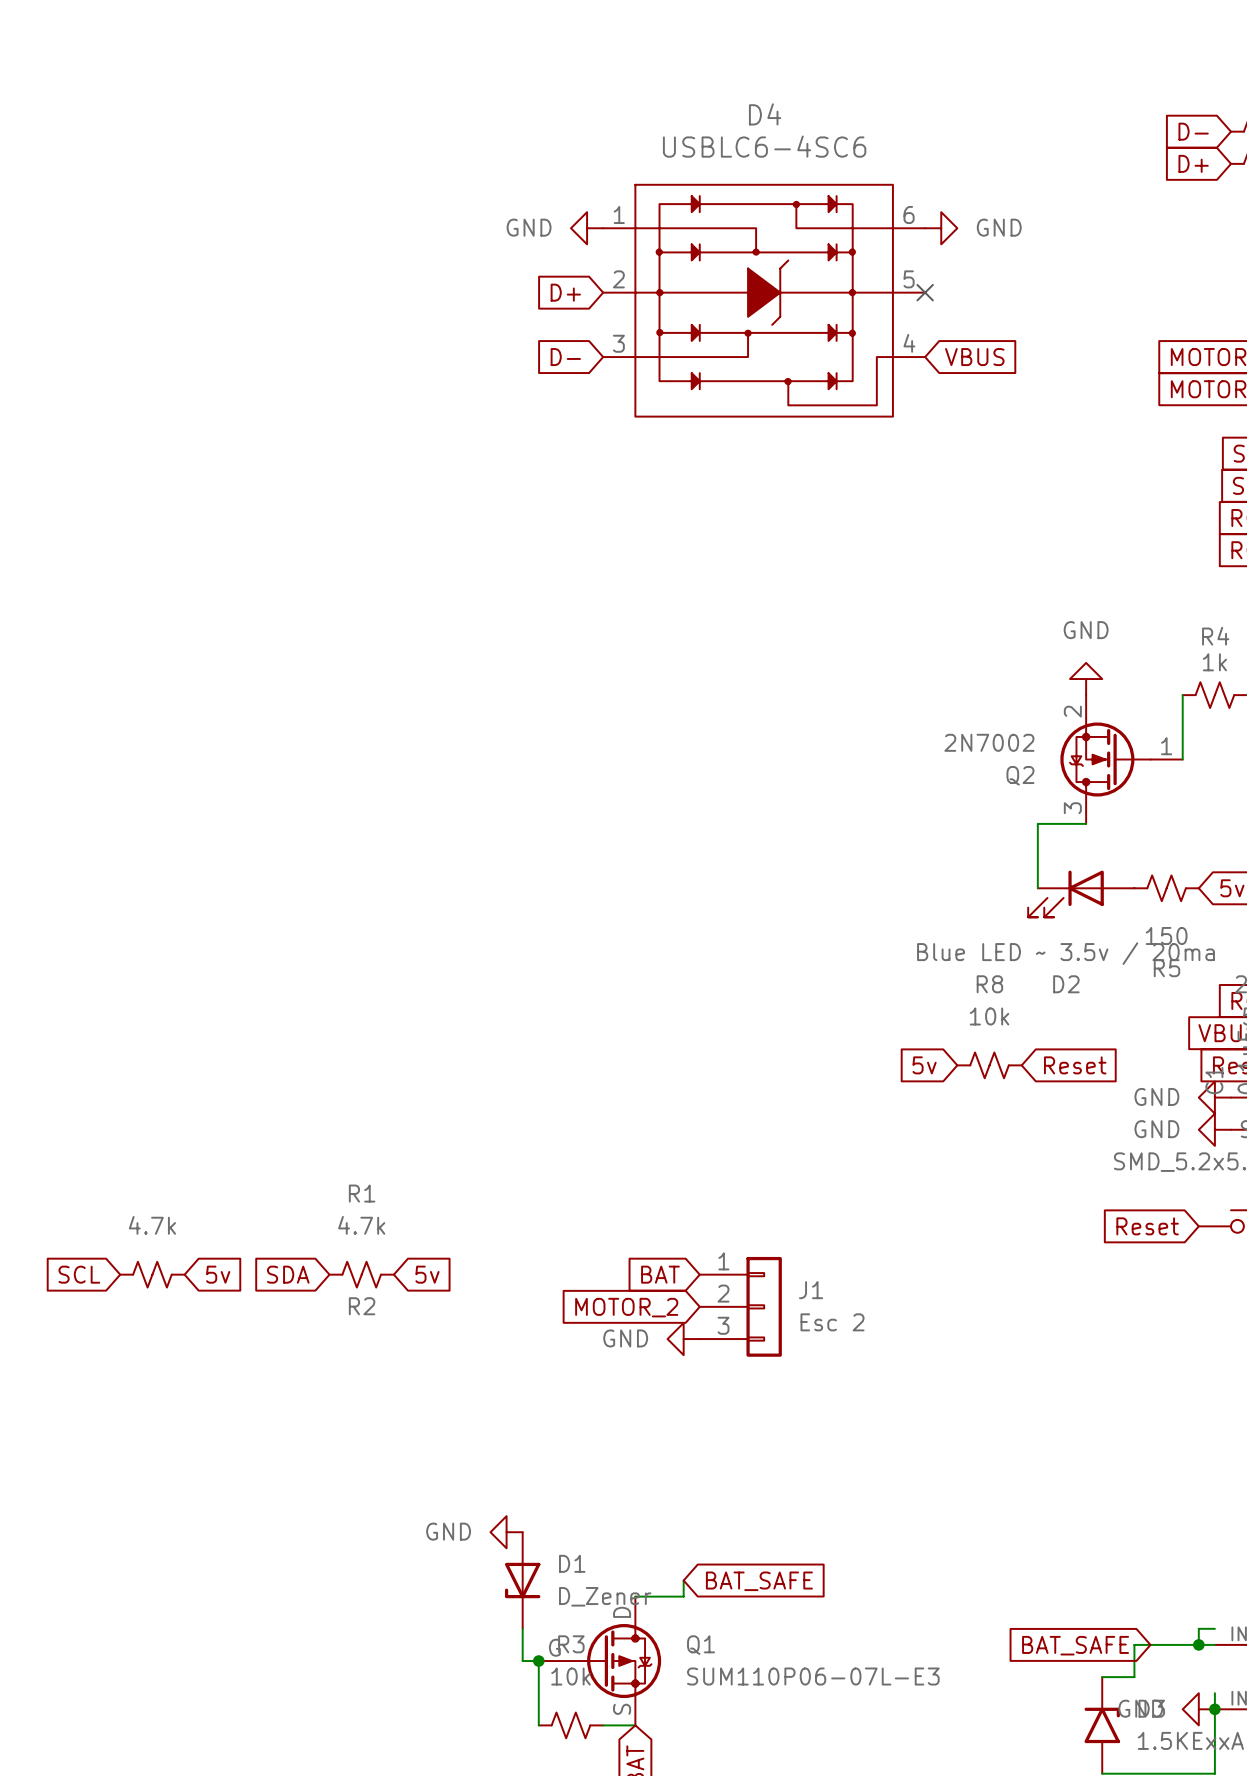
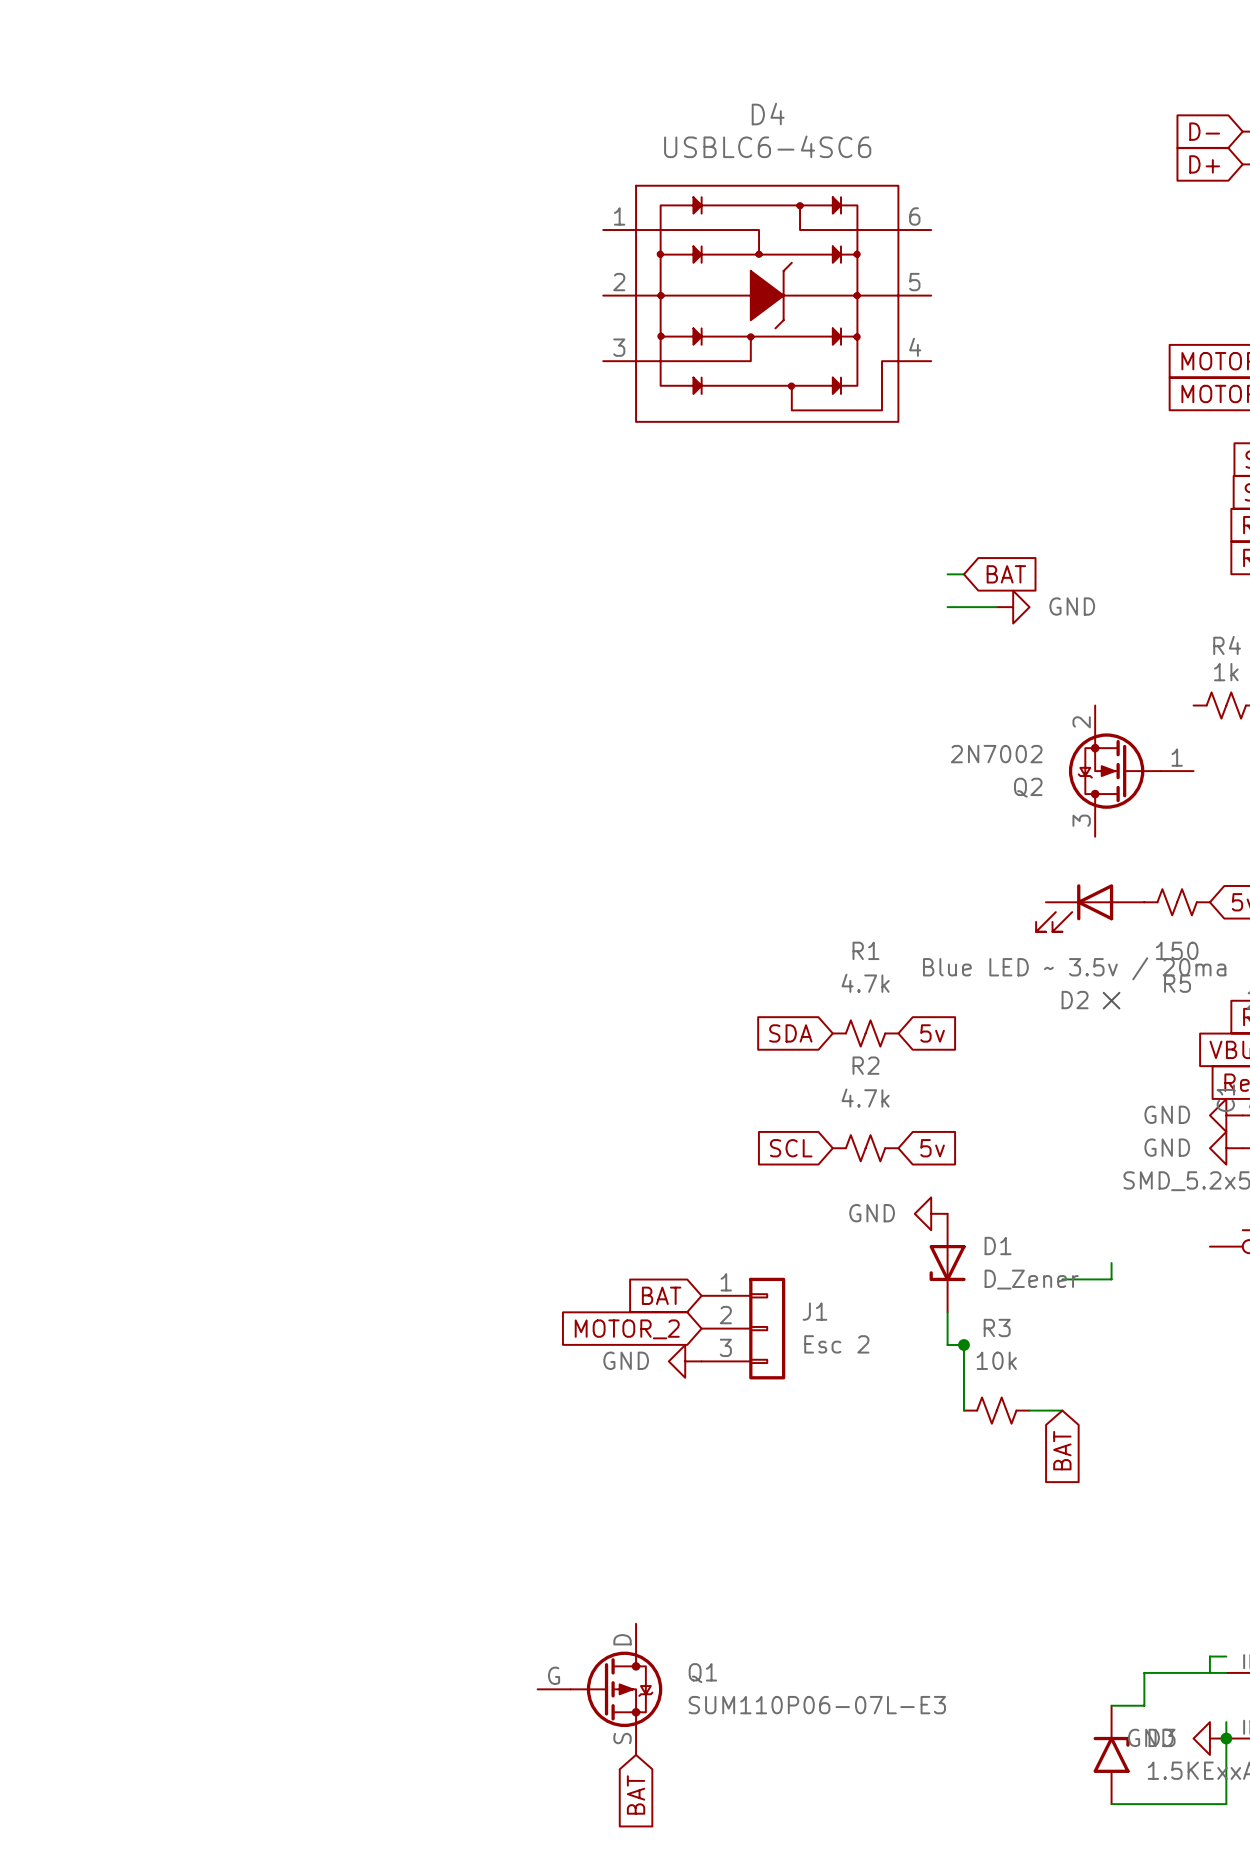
power symbol: GND (587, 228) -> none
power symbol: GND (941, 228) -> none
global label: D+ (565, 292) -> none
no-connect mark: (925, 292) -> none
global label: D- (565, 357) -> none
global label: VBUS (974, 357) -> none
wire: none -> (947, 574) (963, 574)
global label: none -> BAT (1006, 574)
wire: none -> (947, 607) (996, 607)
power symbol rotation: 0° (1086, 679) -> 90° clockwise (1013, 607)
power symbol position: GND (1086, 679) -> GND (1013, 607)
wire: (1182, 695) (1182, 759) -> none
wire: (1086, 823) (1037, 823) (1037, 888) -> none
no-connect mark: none -> (1111, 1000)
global label: none -> SDA (790, 1033)
global label: none -> 5v (932, 1033)
global label: 5v (924, 1065) -> none
R8: 10k (989, 1065) -> none
global label: Reset (1075, 1065) -> none
global label: none -> SCL (791, 1148)
global label: none -> 5v (932, 1148)
power symbol: none -> GND (931, 1213)
global label: Reset (1147, 1226) -> none
wire: none -> (1111, 1263) (1111, 1279) (1062, 1279)
global label: SCL (79, 1274) -> none
R2 position: (152, 1274) -> (865, 1148)
global label: 5v (218, 1274) -> none
global label: SDA (288, 1274) -> none
R1 position: (361, 1274) -> (865, 1033)
global label: 5v (427, 1274) -> none
wire: none -> (947, 1312) (947, 1345) (963, 1345) (963, 1410)
R2 name position: R2 (362, 1306) -> R2 (865, 1065)
junction: none -> (963, 1345)
wire: none -> (1029, 1410) (1062, 1410)
global label: none -> BAT (1062, 1450)
power symbol: GND (506, 1532) -> none
D1 position: (522, 1580) -> (947, 1263)
wire: (683, 1580) (683, 1596) (635, 1596) -> none
global label: BAT_SAFE (759, 1581) -> none
wire: (522, 1628) (522, 1661) (538, 1661) (538, 1725) -> none
junction: (1198, 1644) -> none
global label: BAT_SAFE (1075, 1645) -> none
junction: (538, 1661) -> none
R3 position: (570, 1725) -> (996, 1410)
wire: (603, 1725) (635, 1725) -> none

